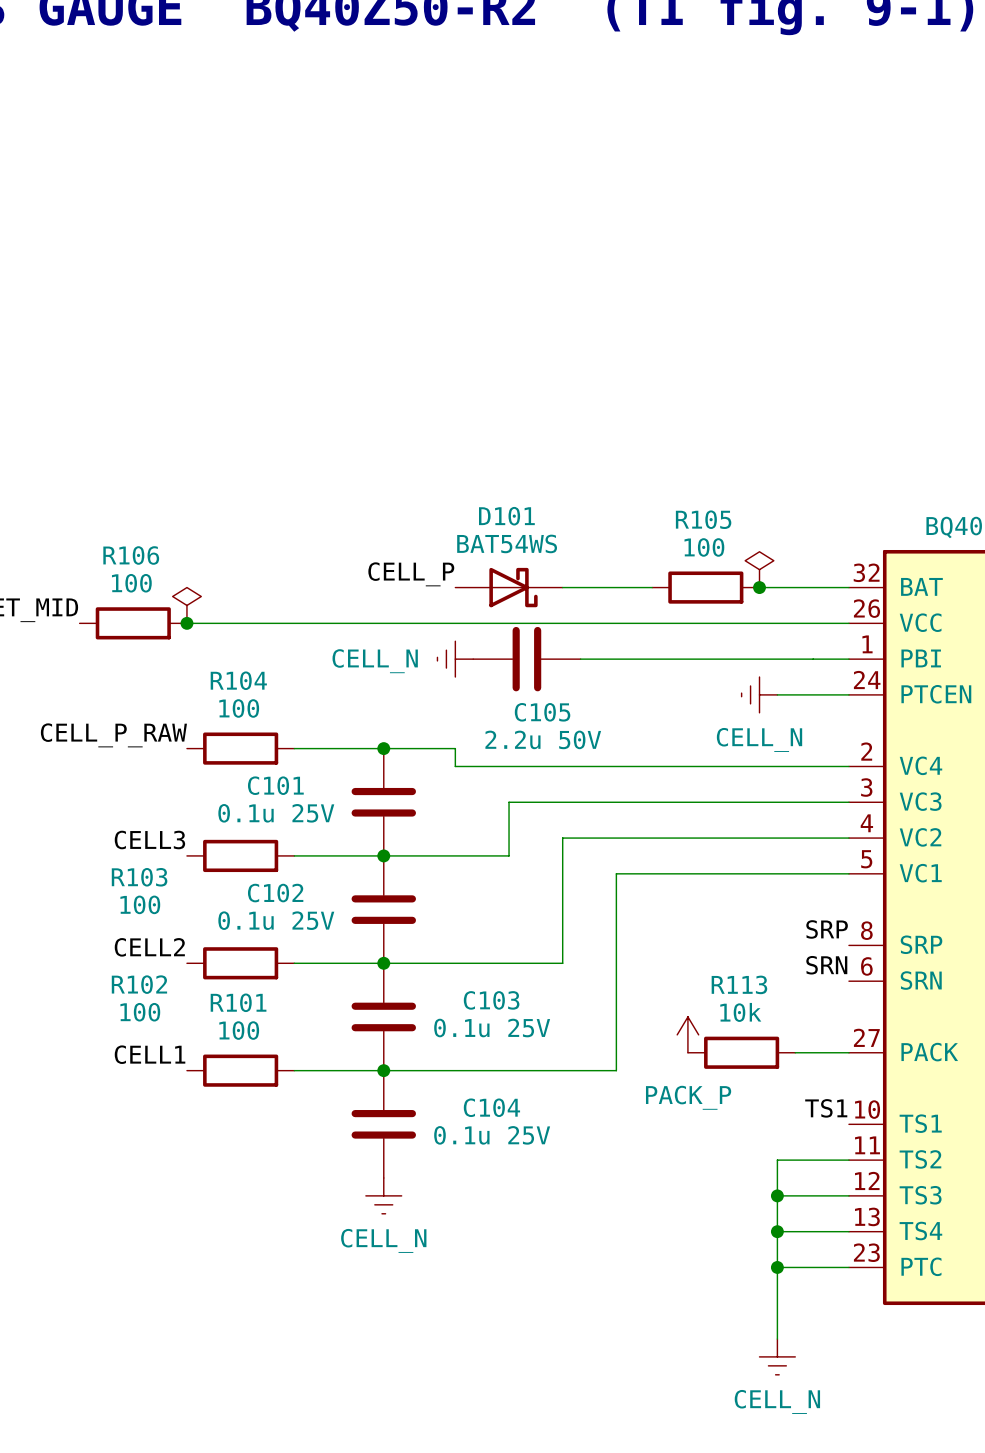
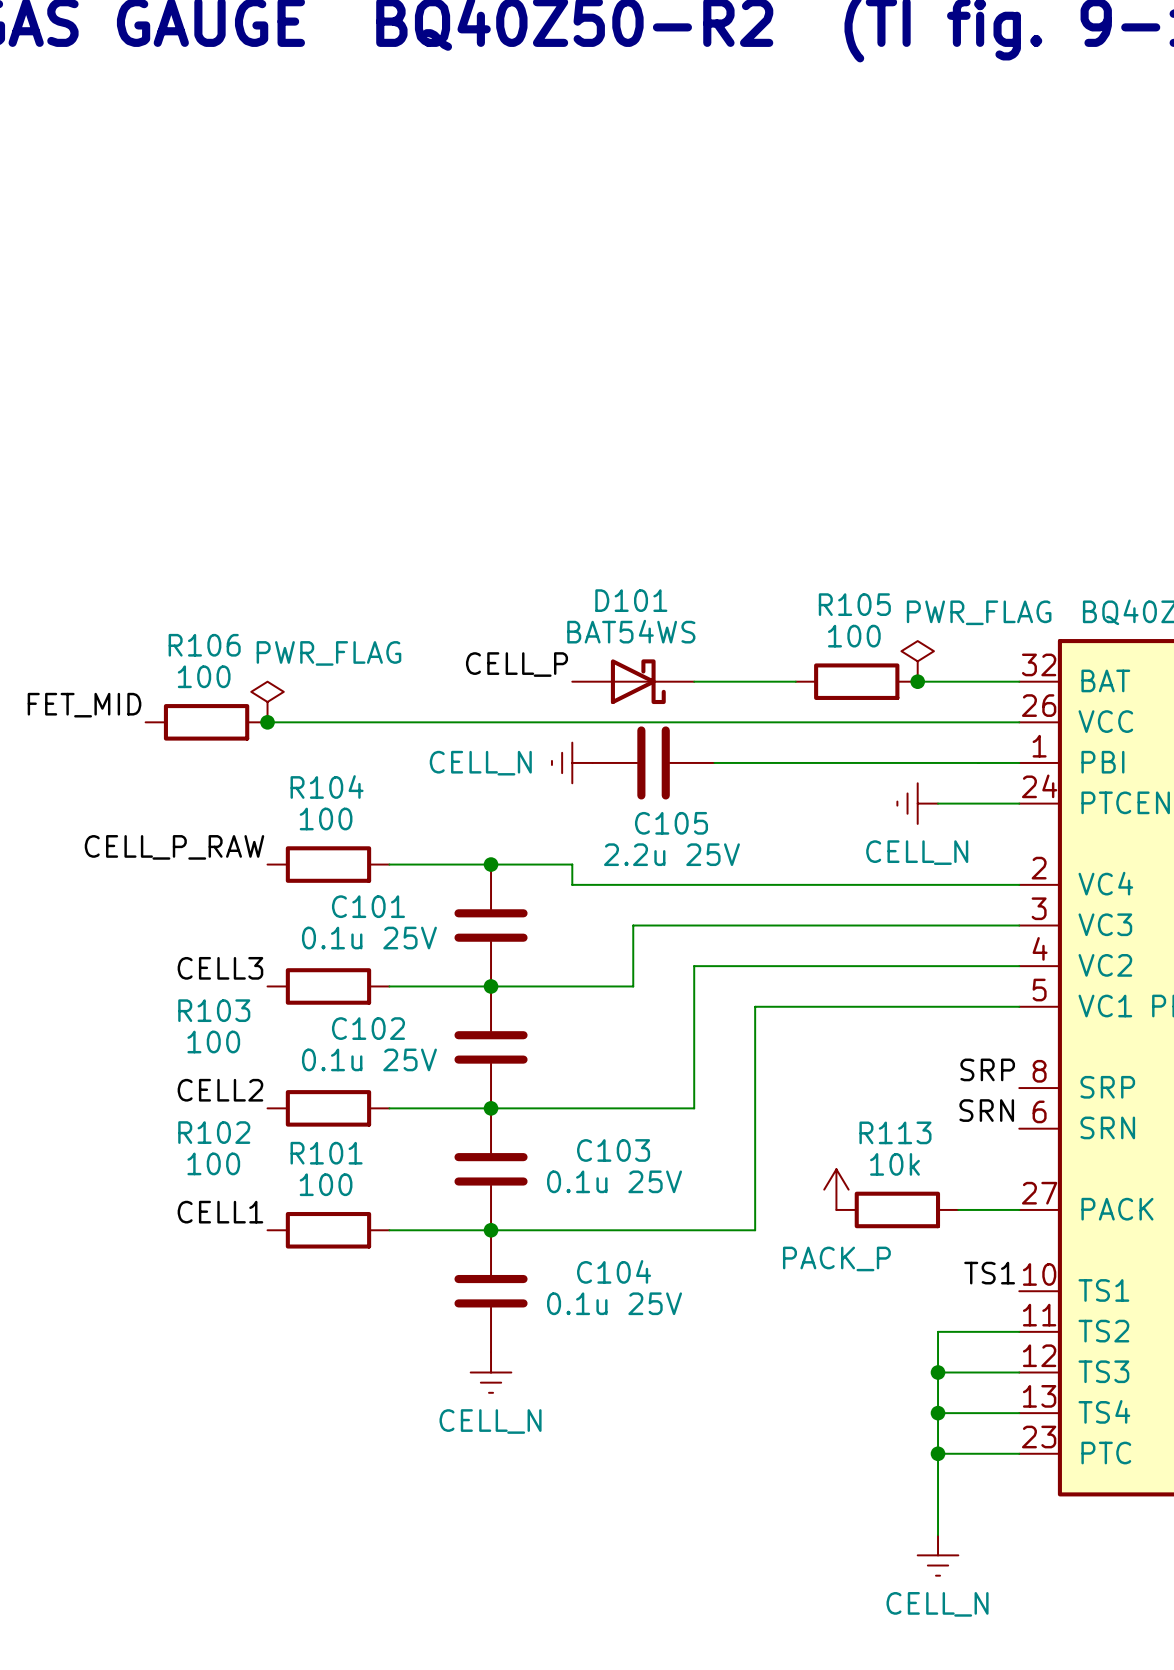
power symbol text: none -> PWR_FLAG (979, 612)
power symbol text: none -> PWR_FLAG (328, 653)
C105 value: 2.2u 50V (543, 739) -> 2.2u 25V (671, 854)

